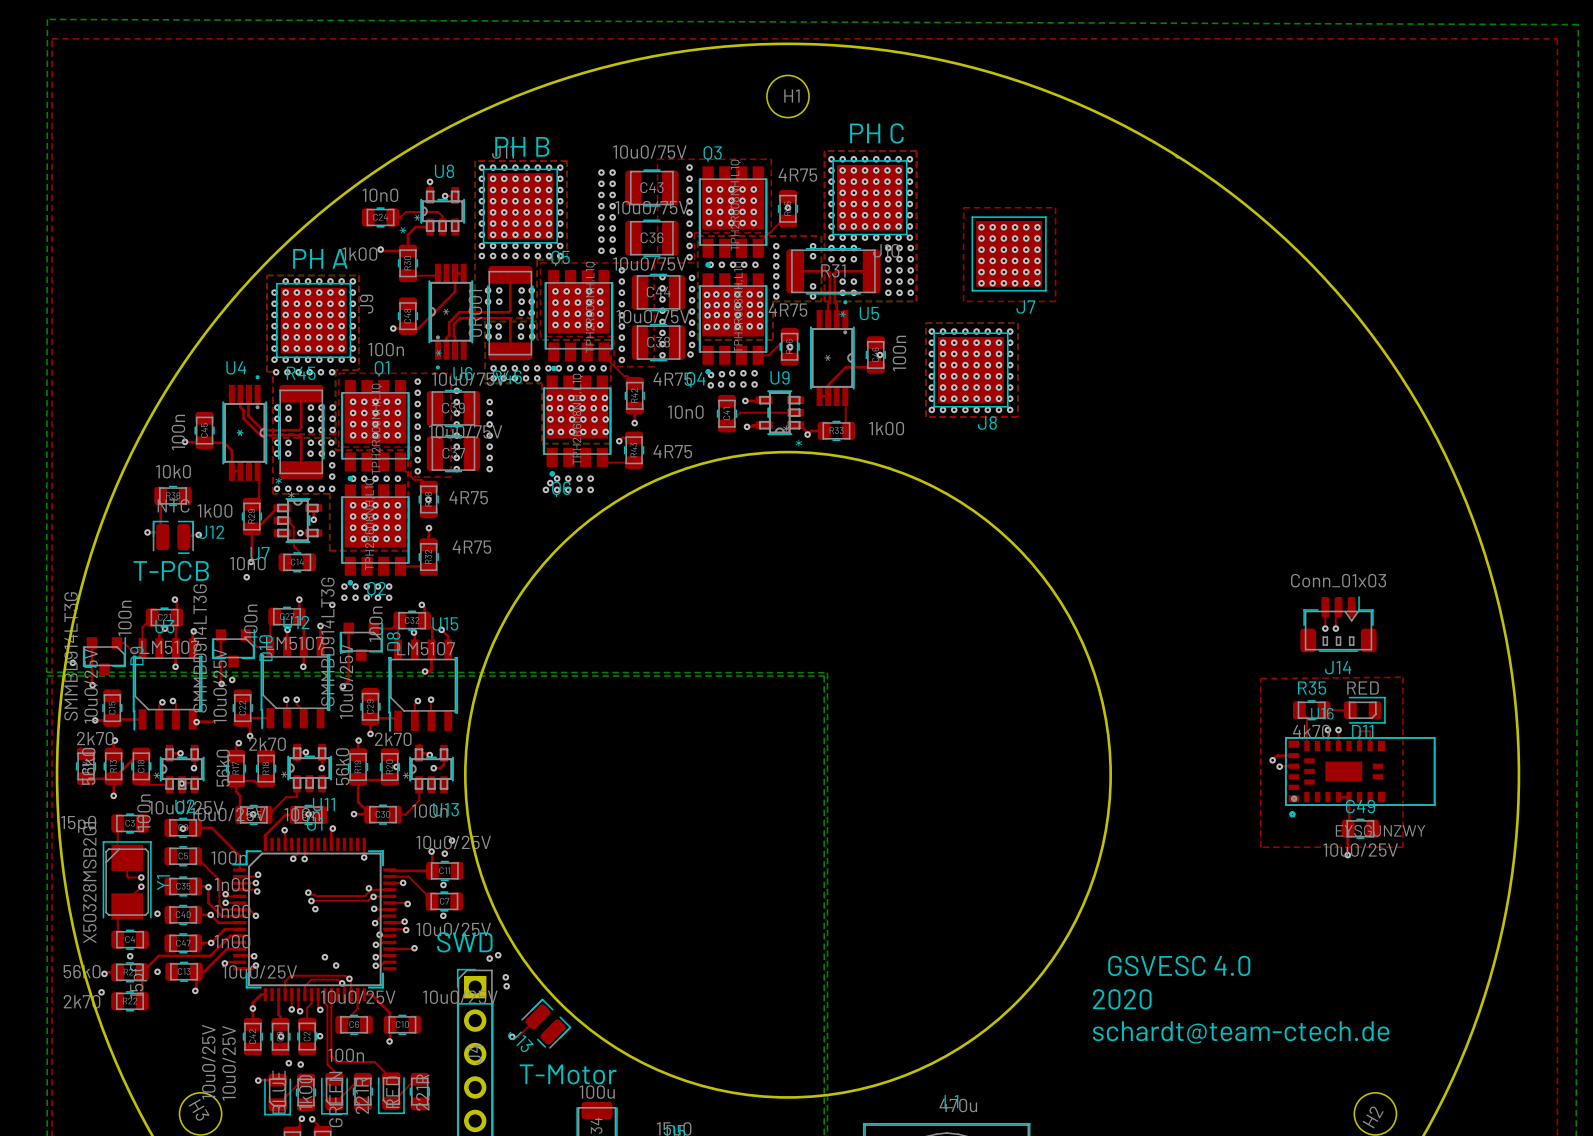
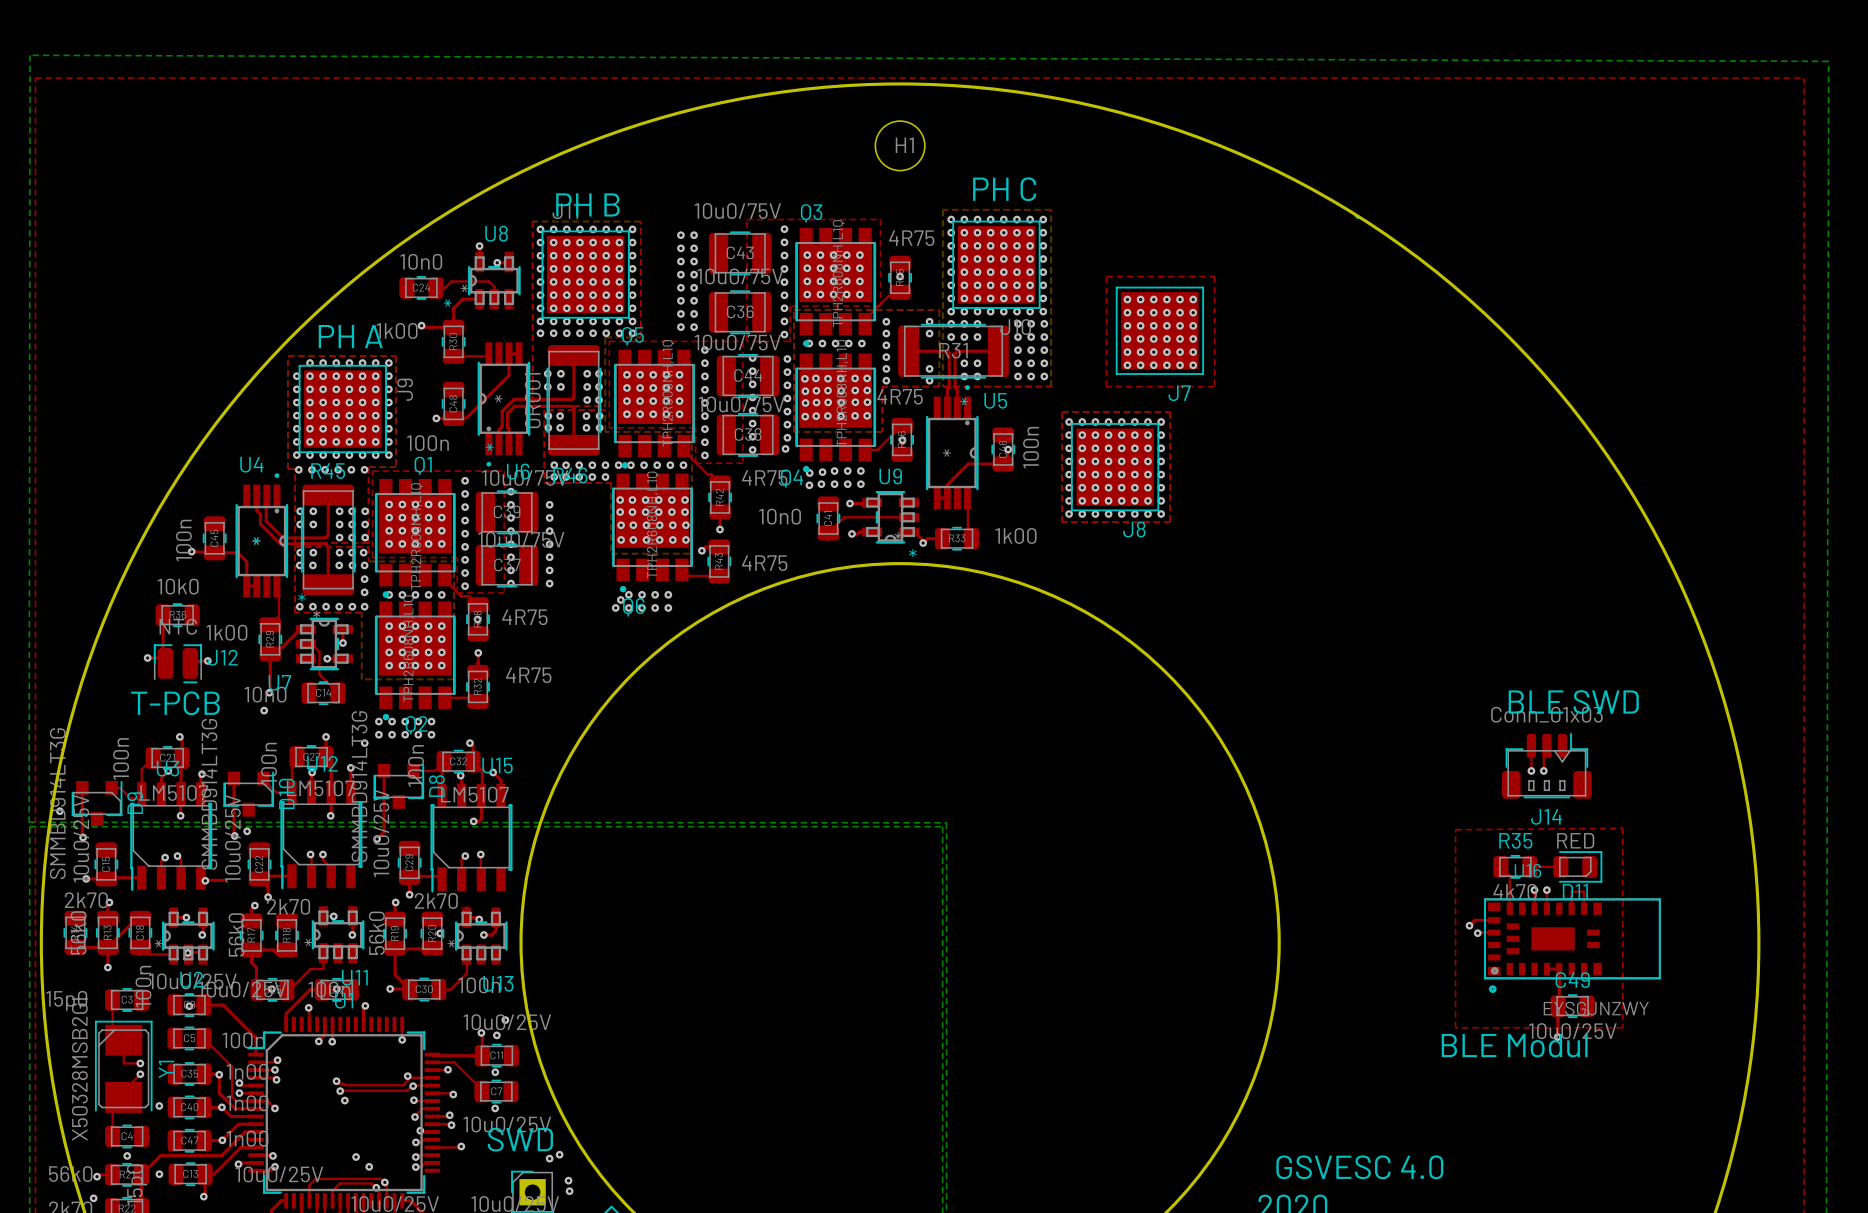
text: none -> BLE SWD (1573, 702)
text: none -> BLE Modul (1514, 1045)

